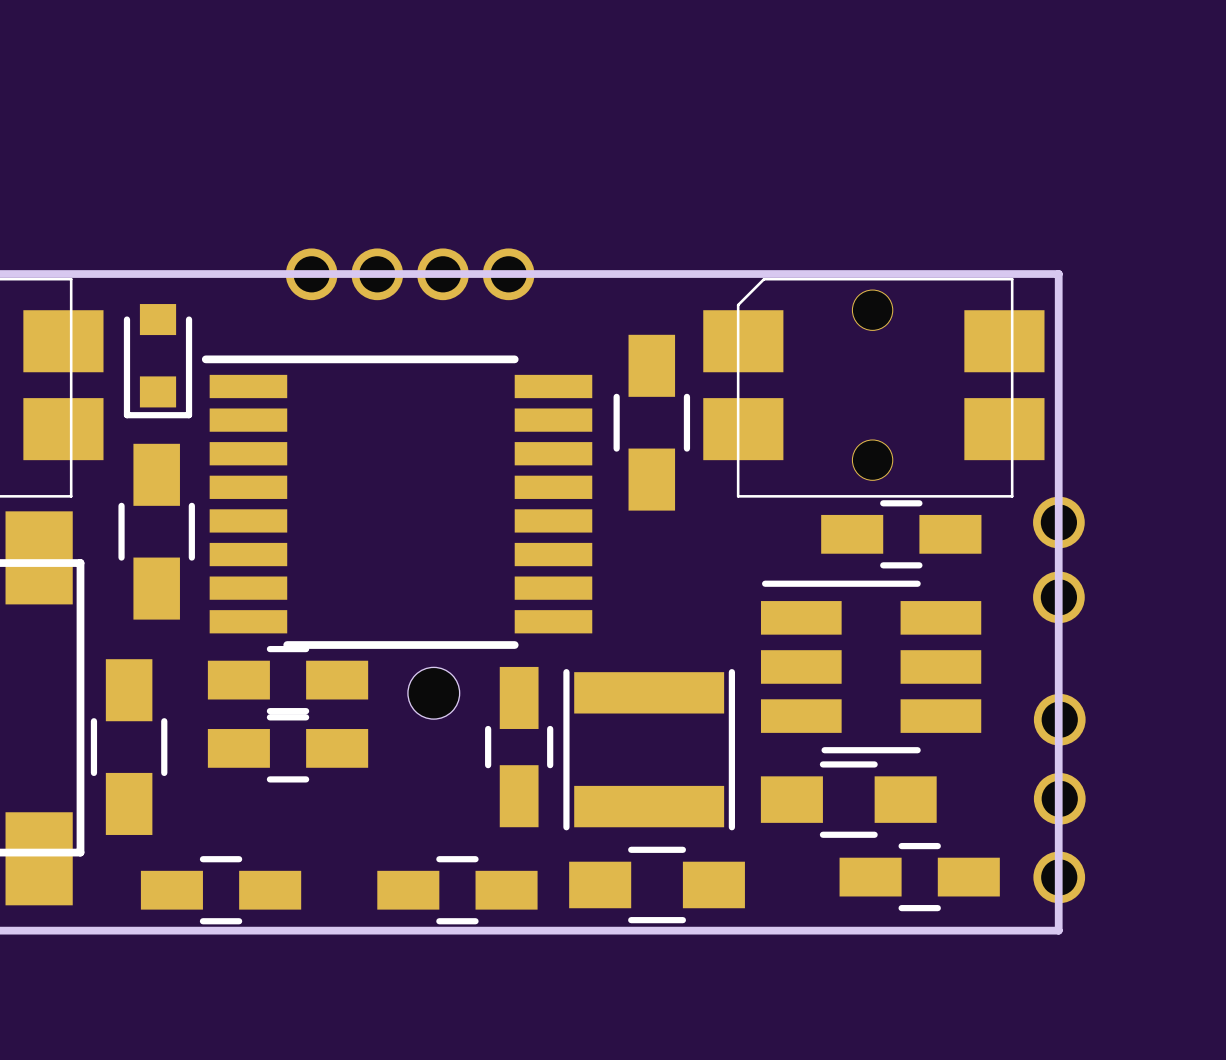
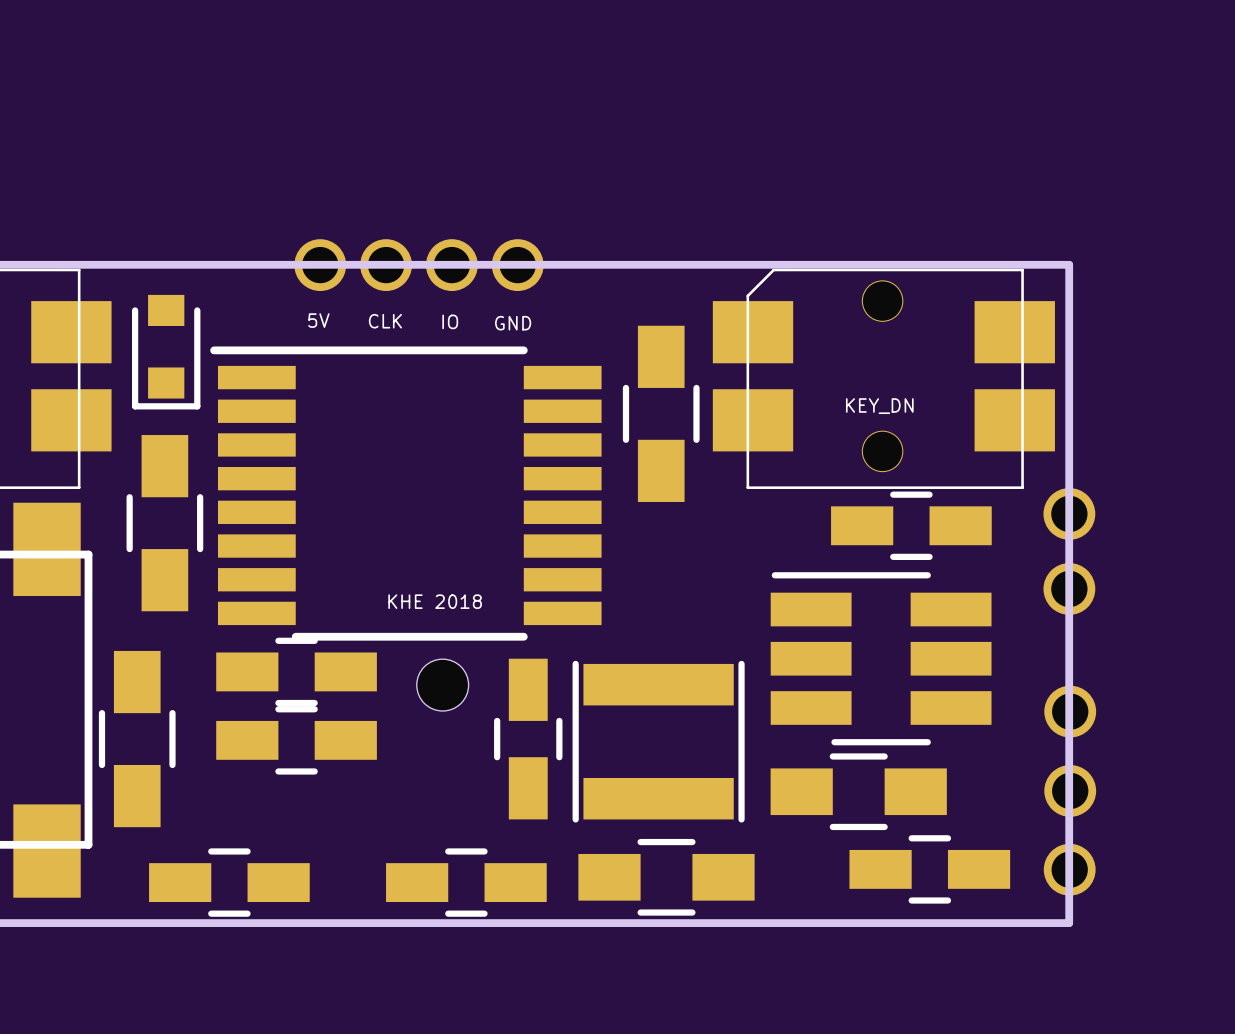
text: none -> 5V (318, 320)
text: none -> CLK (385, 321)
text: none -> IO (450, 321)
text: none -> GND (513, 323)
text: none -> KEY_DN (879, 406)
text: none -> KHE 2018 (435, 601)

